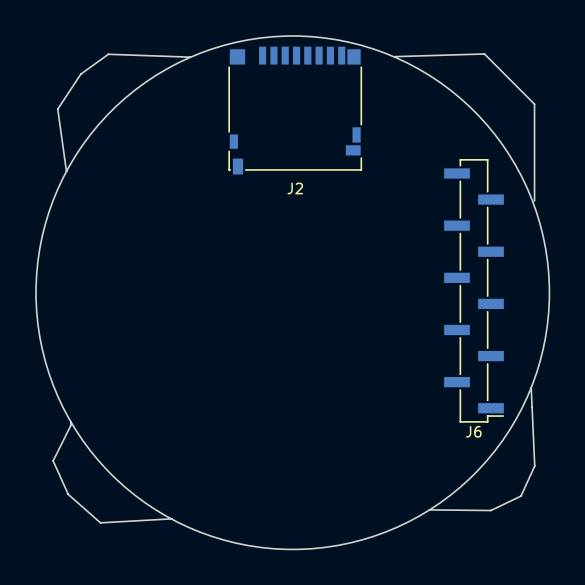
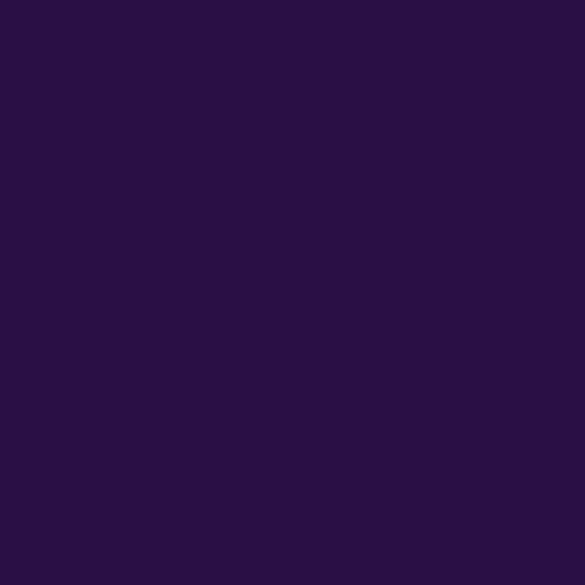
round board edge: [35, 35, 550, 550] -> none
board edge: (394, 56) (484, 53) (534, 104) (534, 200) -> none
board edge: (190, 57) (108, 54) (80, 74) (57, 109) (66, 171) -> none
J2: (295, 110) -> none
J6: (474, 290) -> none
board edge: (531, 387) (534, 466) (520, 496) (490, 510) (429, 509) -> none
board edge: (70, 421) (70, 425) (53, 460) (68, 494) (100, 522) (172, 518) -> none

